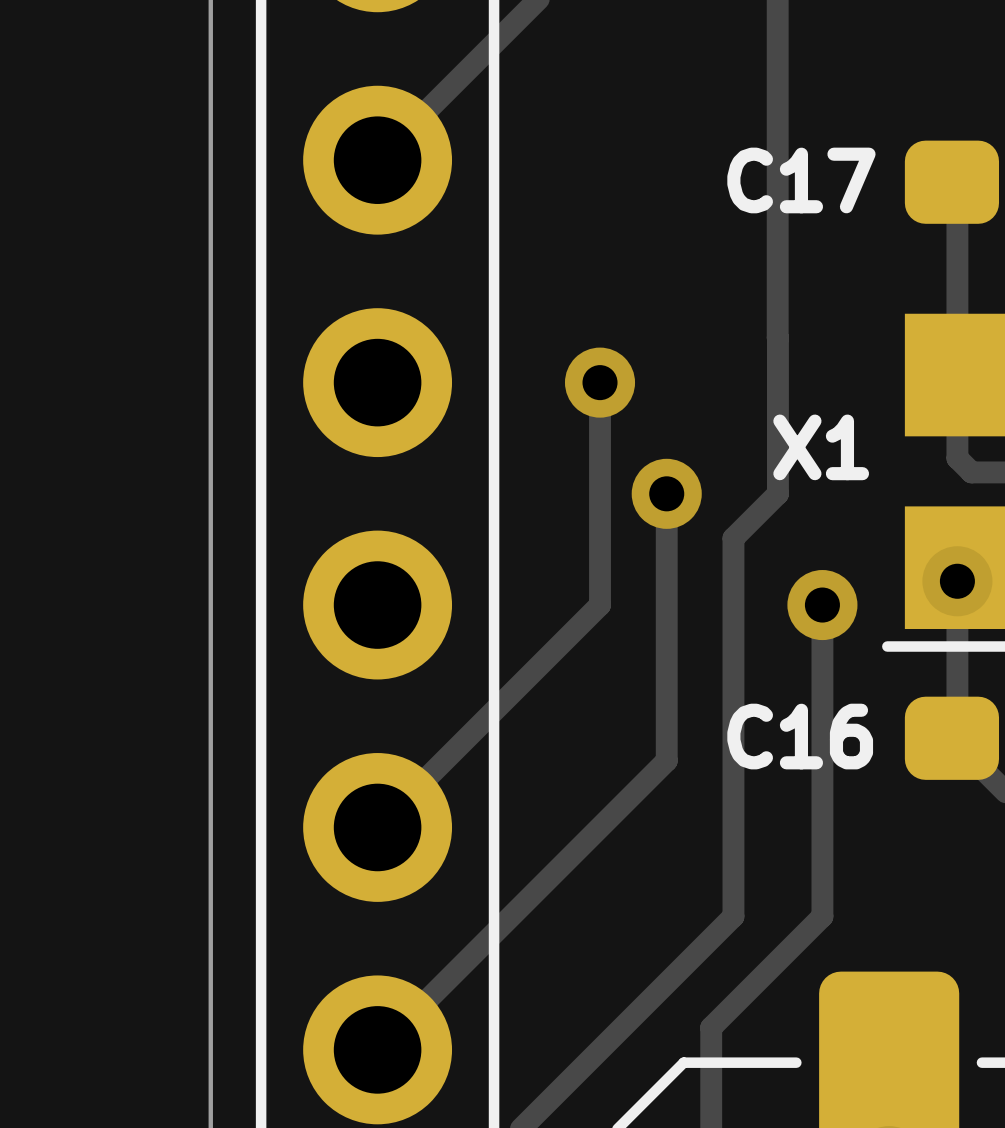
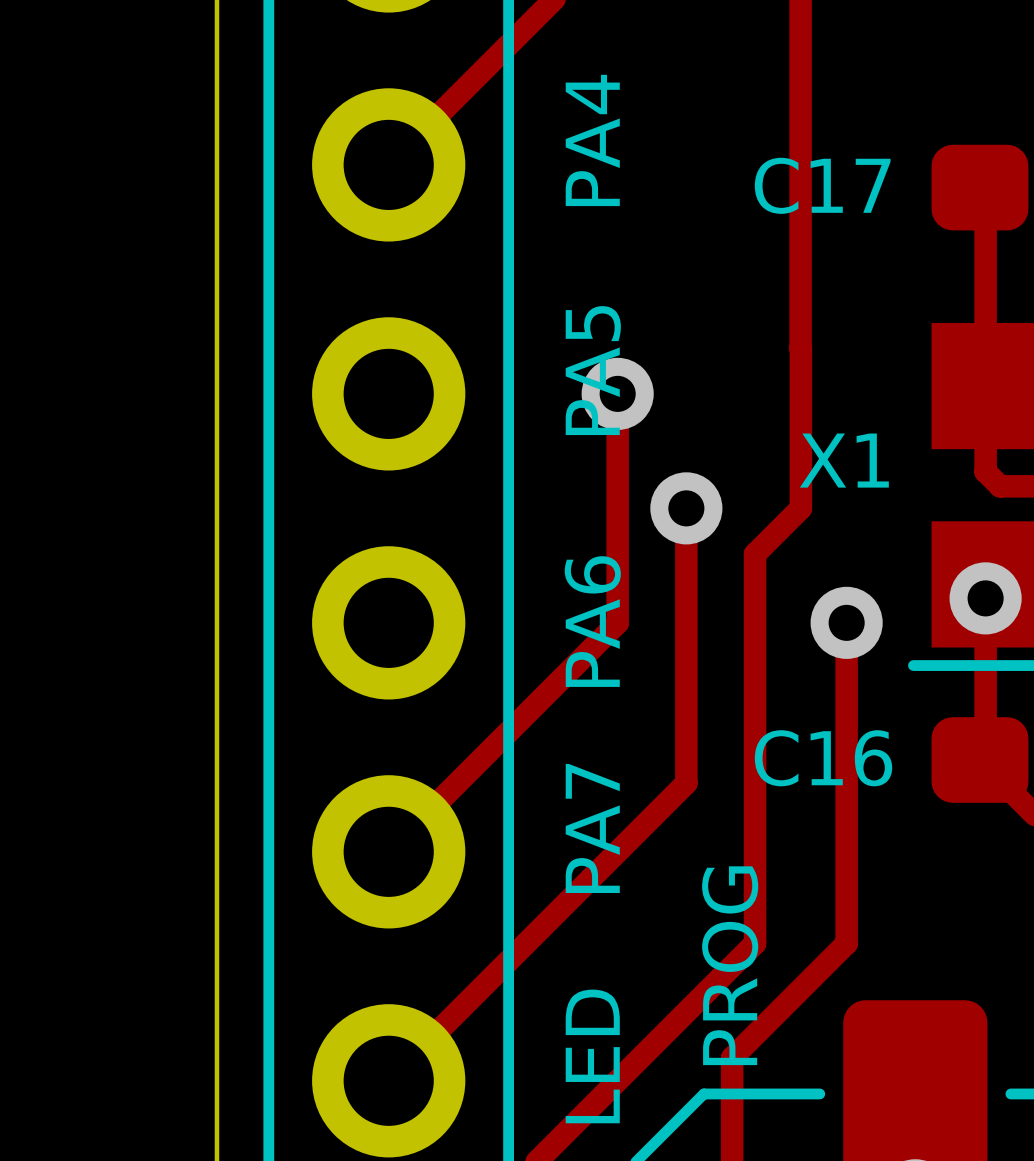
text: none -> PA4 (592, 140)
text: none -> PA5 (593, 370)
text: none -> PA6 (592, 621)
text: none -> PA7 (592, 828)
text: none -> PROG (730, 965)
text: none -> LED (592, 1056)

